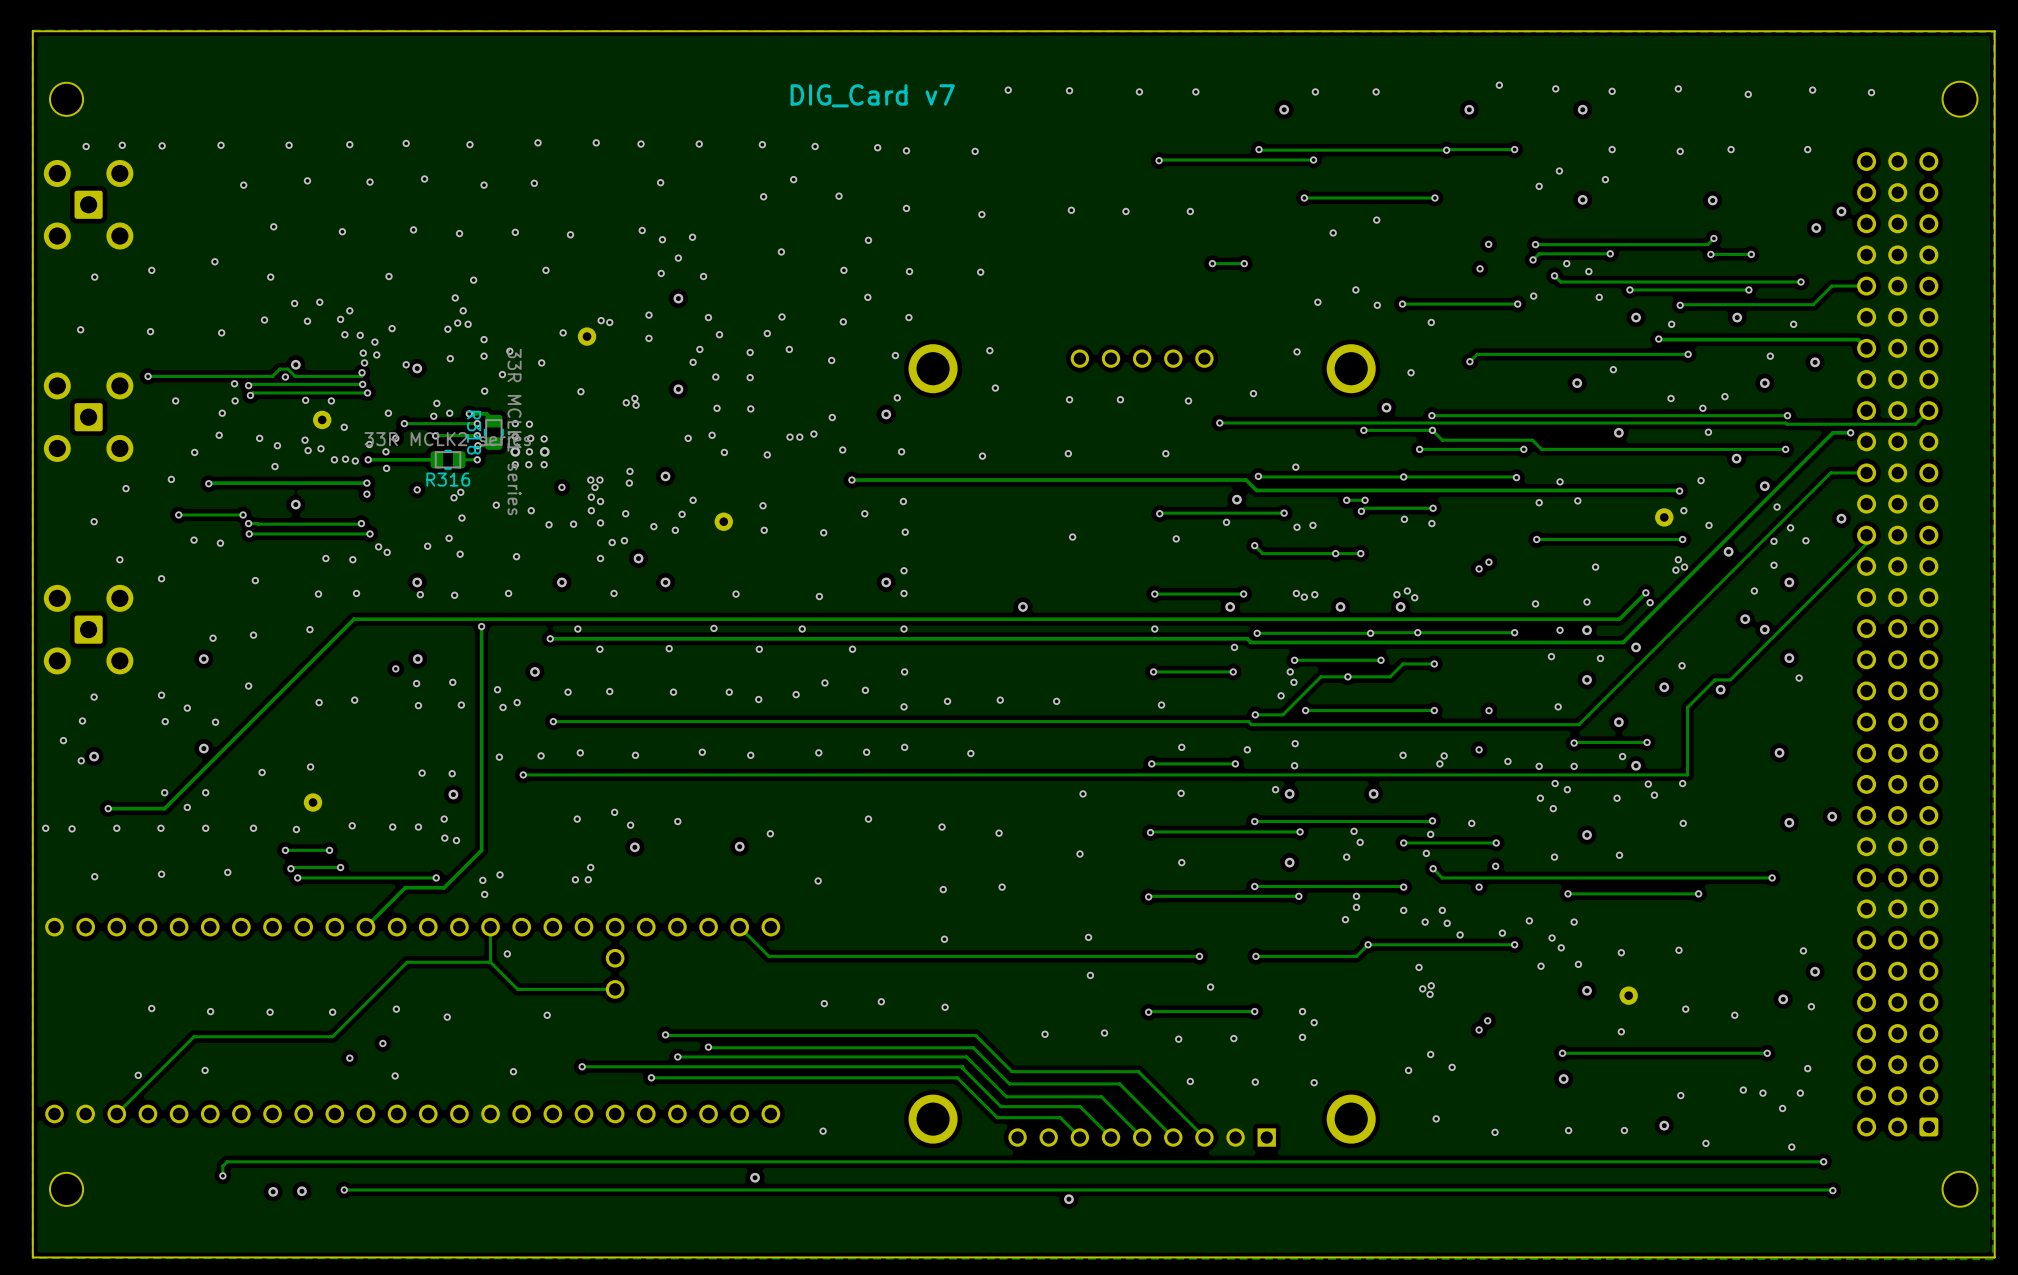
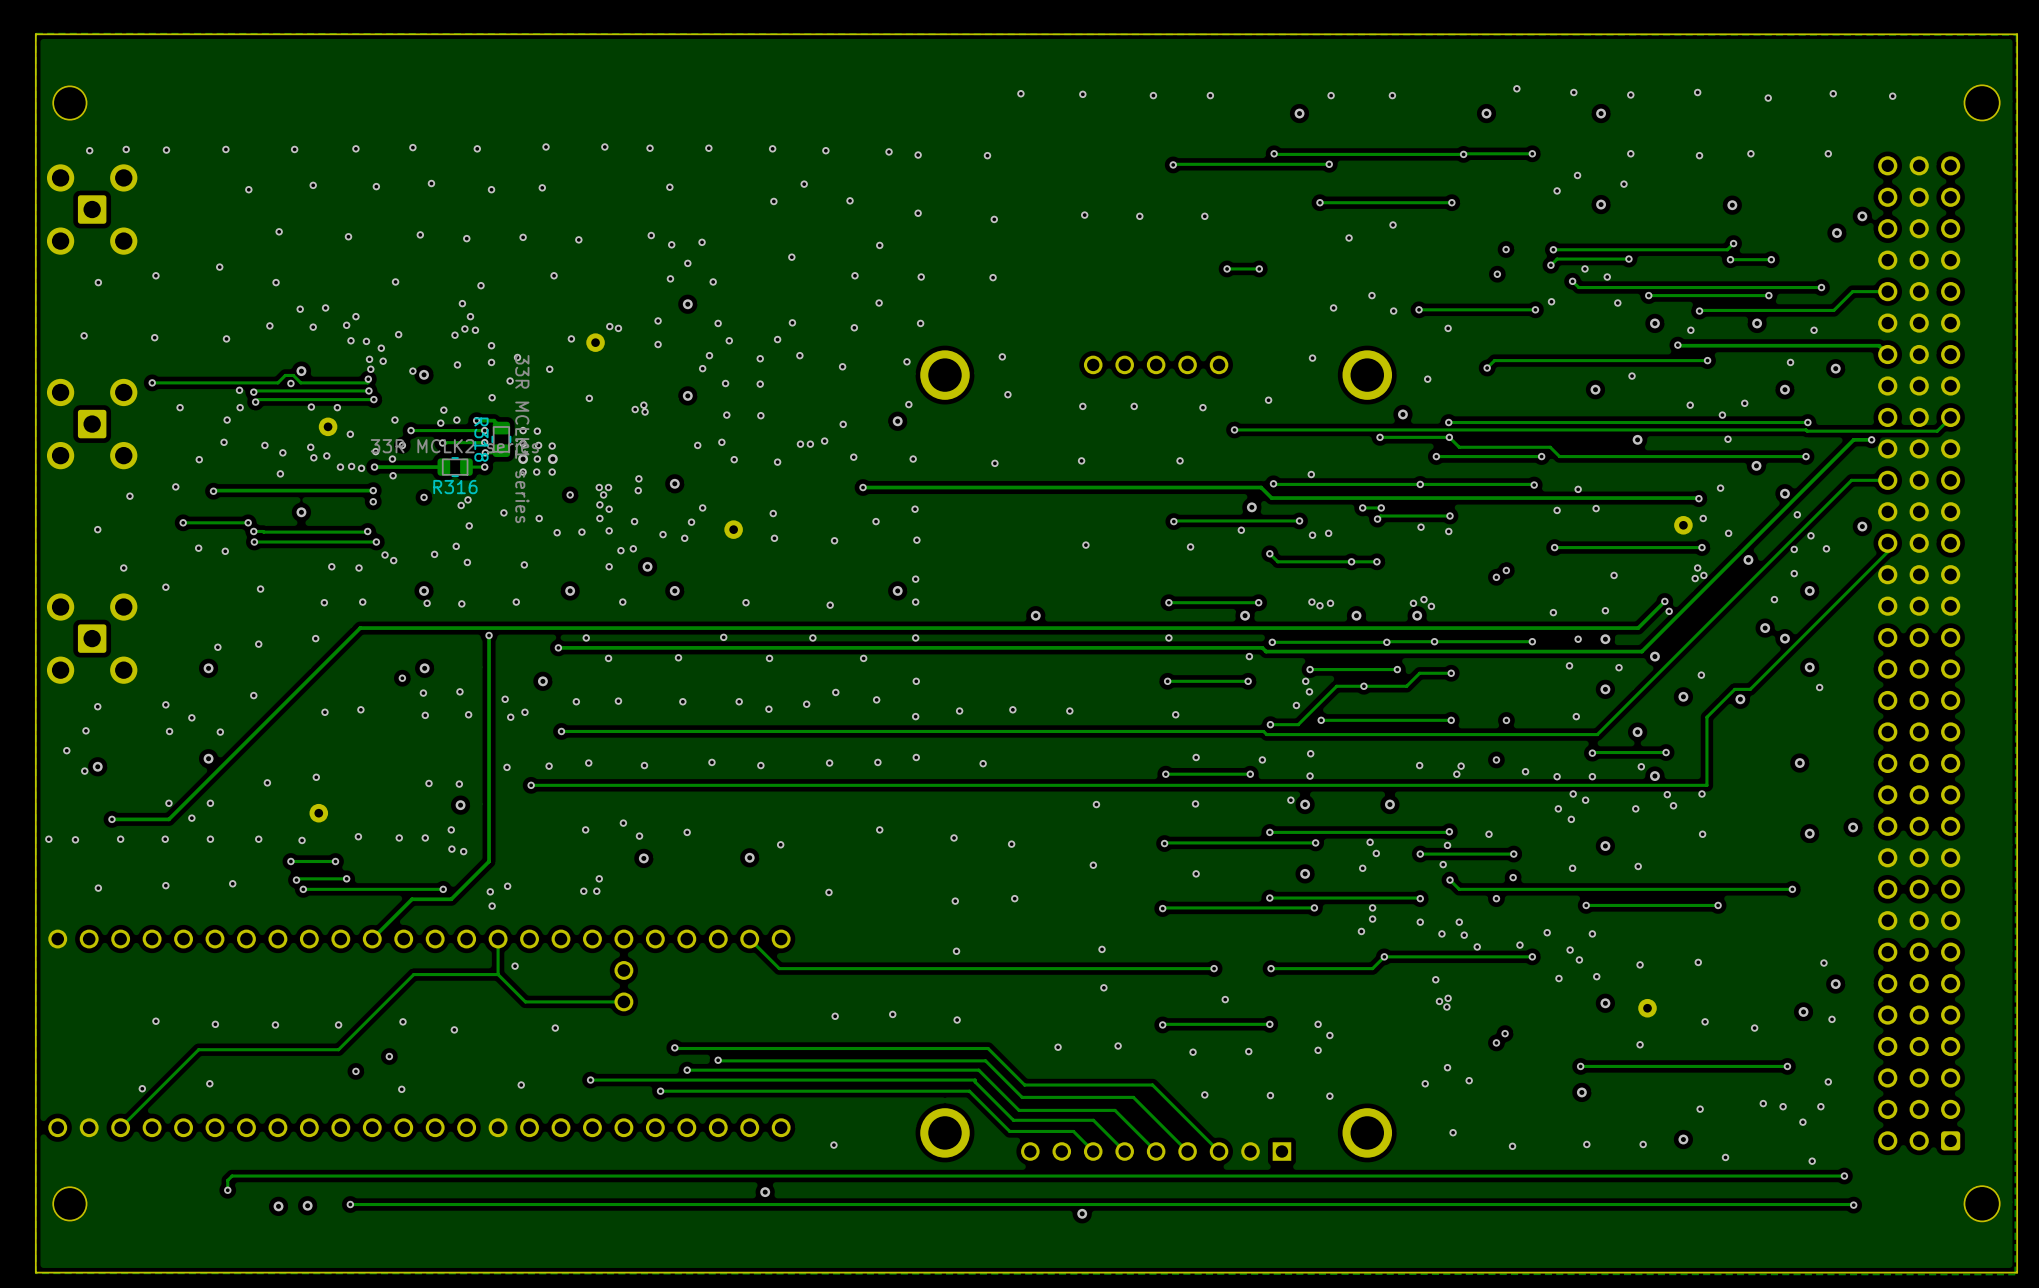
text: DIG_Card v7 (872, 95) -> none

